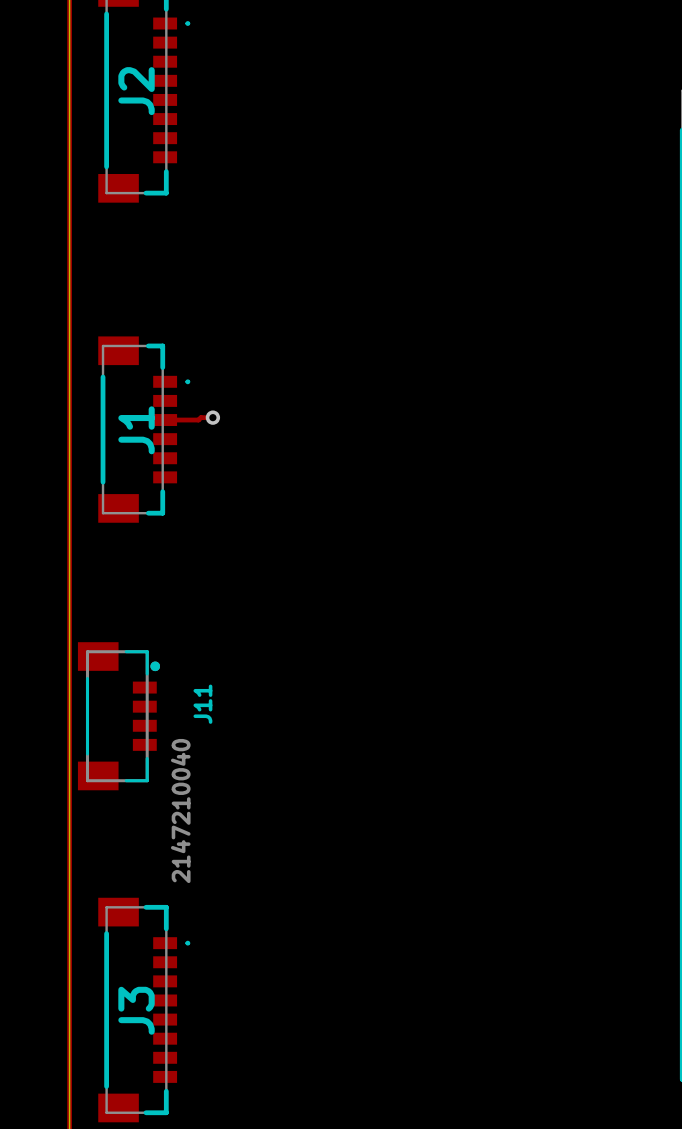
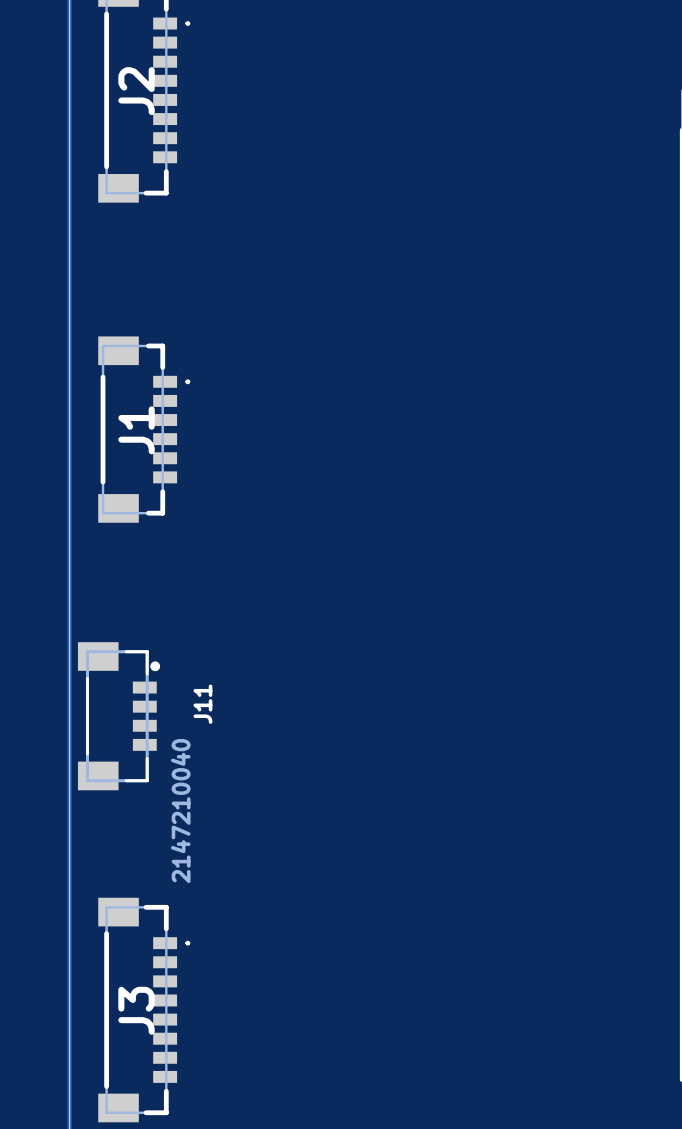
track: (212, 417) (200, 417) (198, 420) (165, 420) -> none
via: (212, 417) -> none

